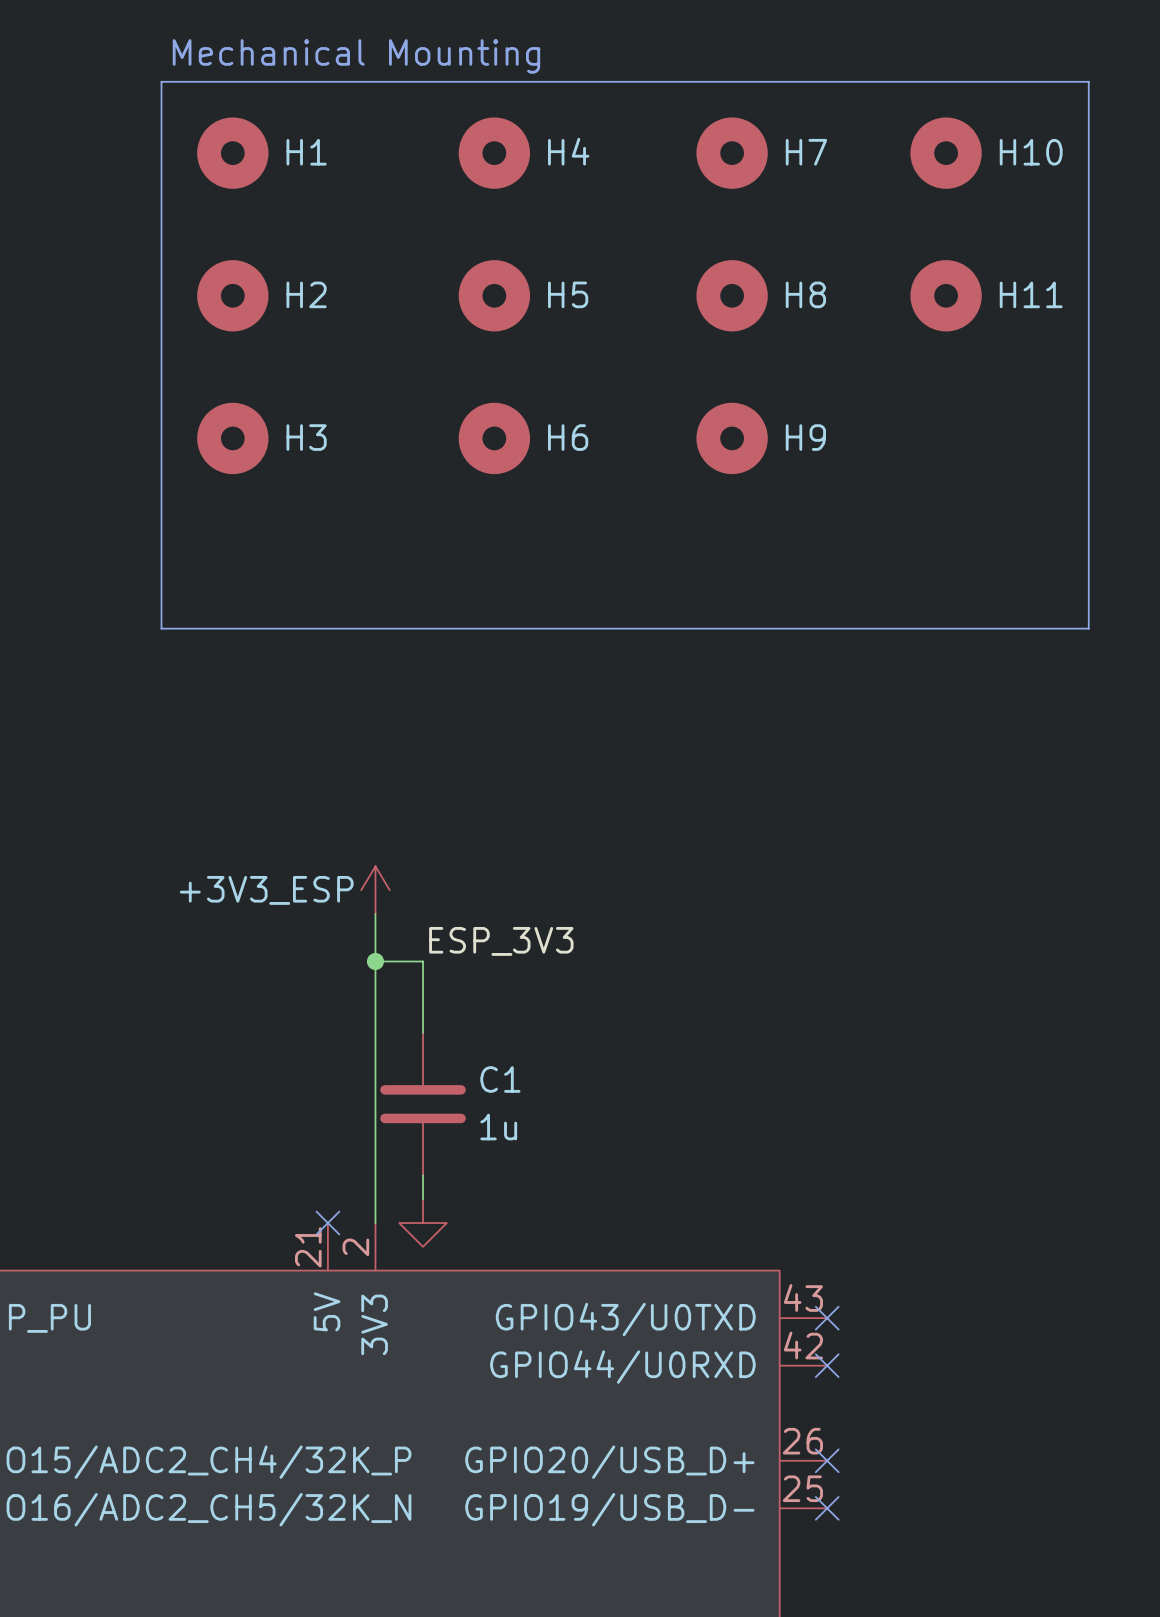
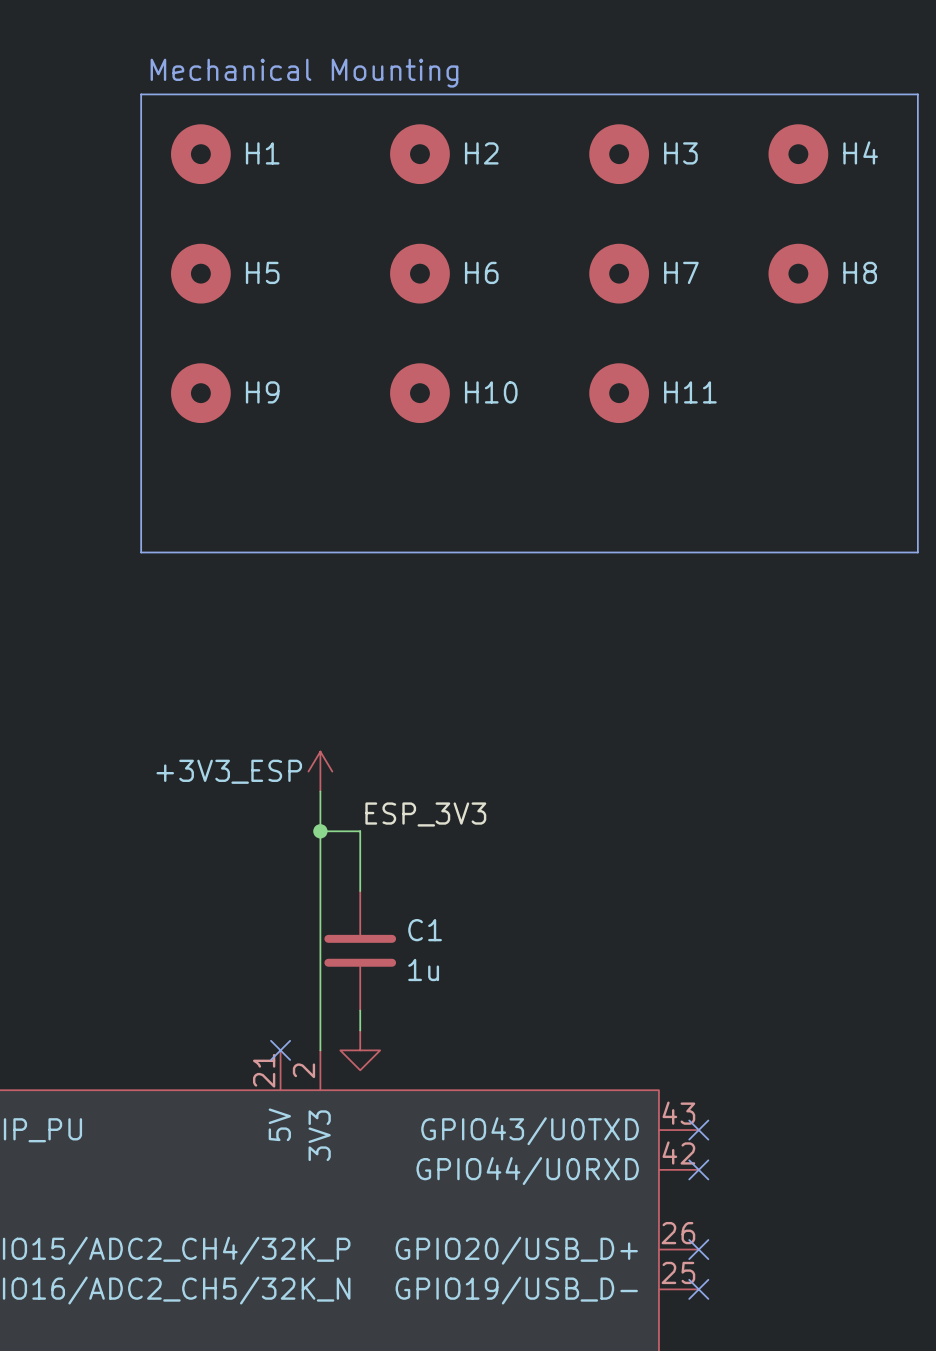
H4 name: H4 (568, 151) -> H2 (481, 153)
H7 name: H7 (806, 152) -> H3 (680, 153)
H10 name: H10 (1031, 152) -> H4 (860, 152)
H2 name: H2 (306, 294) -> H5 (262, 272)
H5 name: H5 (568, 294) -> H6 (481, 272)
H8 name: H8 (805, 294) -> H7 (681, 272)
H11 name: H11 (1031, 294) -> H8 (860, 272)
H3 name: H3 (306, 437) -> H9 (262, 392)
H6 name: H6 (568, 437) -> H10 (491, 392)
H9 name: H9 (805, 437) -> H11 (690, 392)

